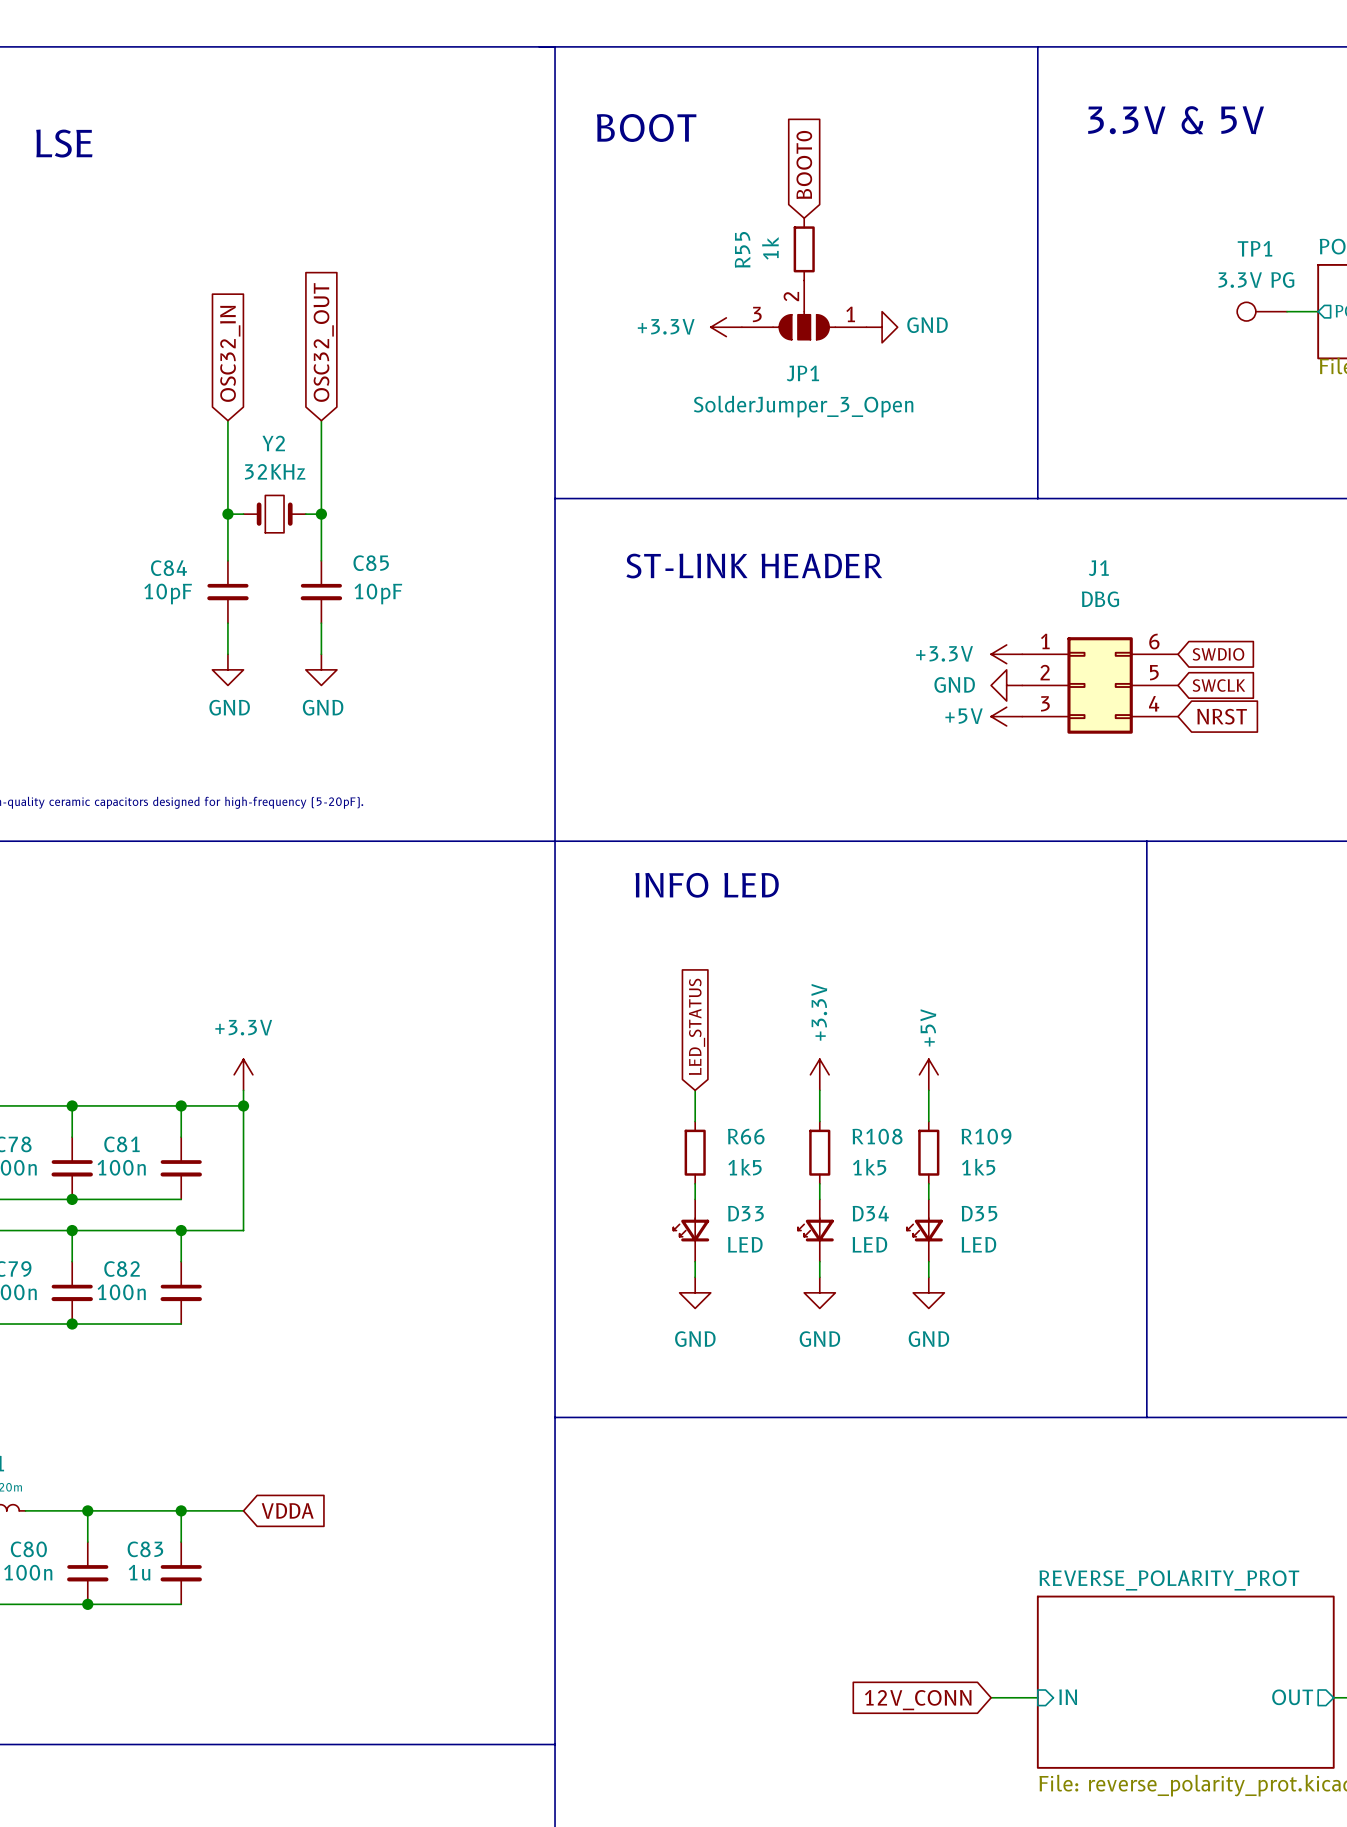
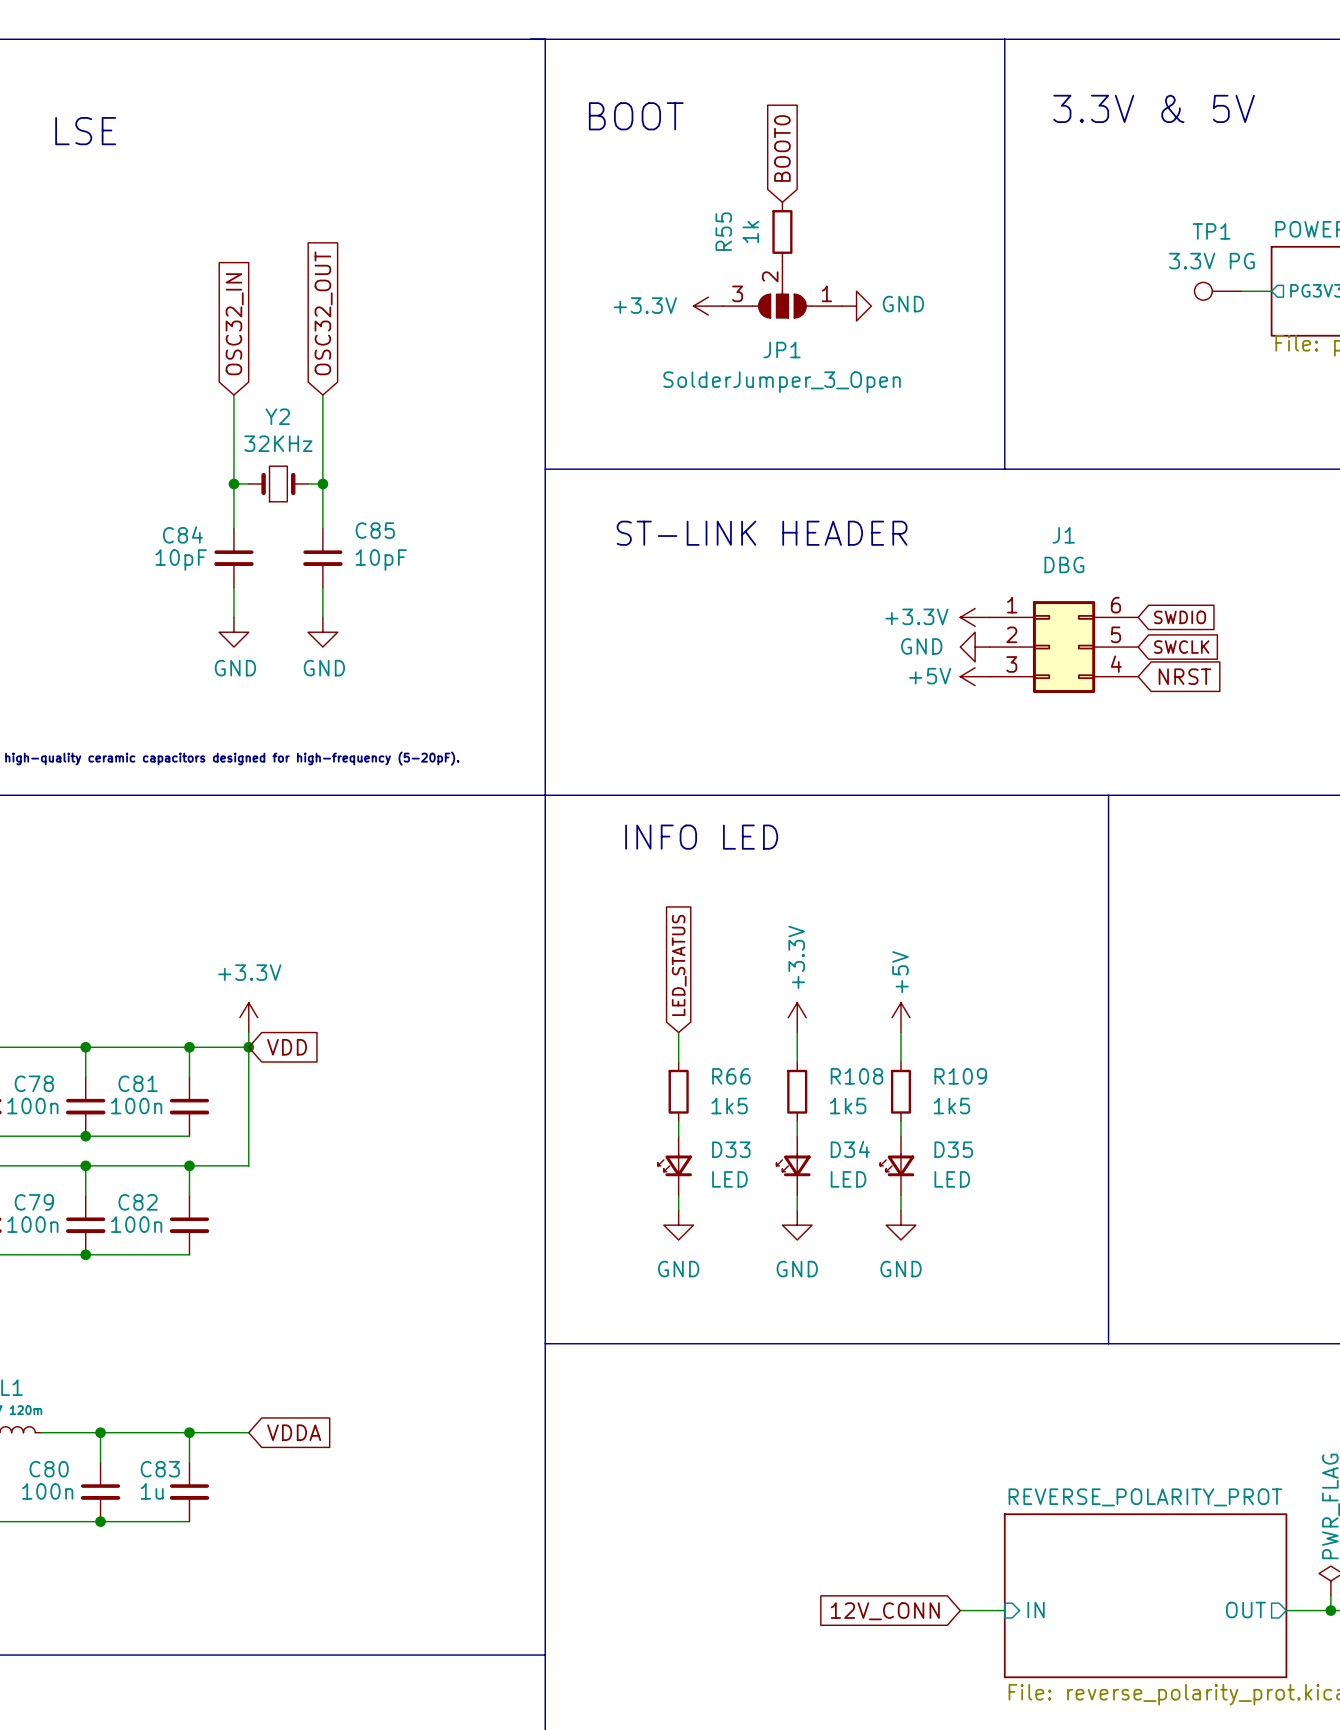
global label: none -> VDD (287, 1047)

